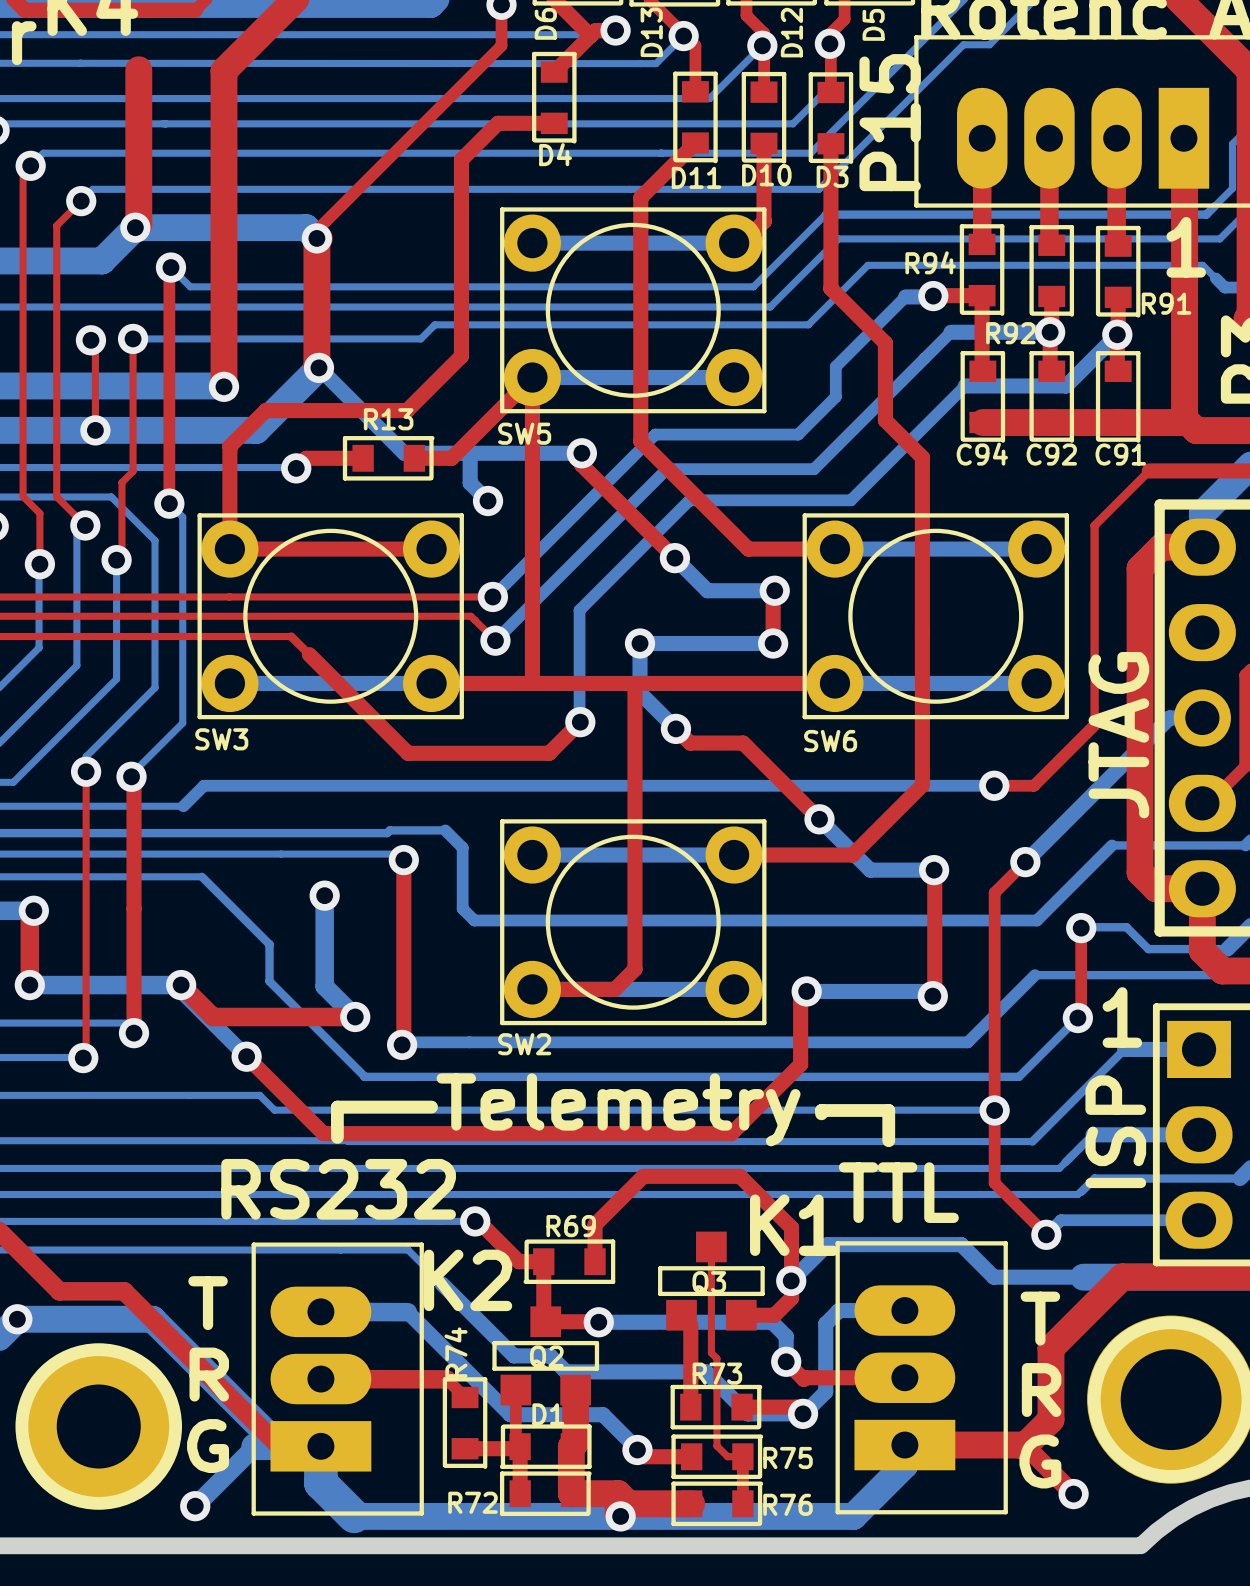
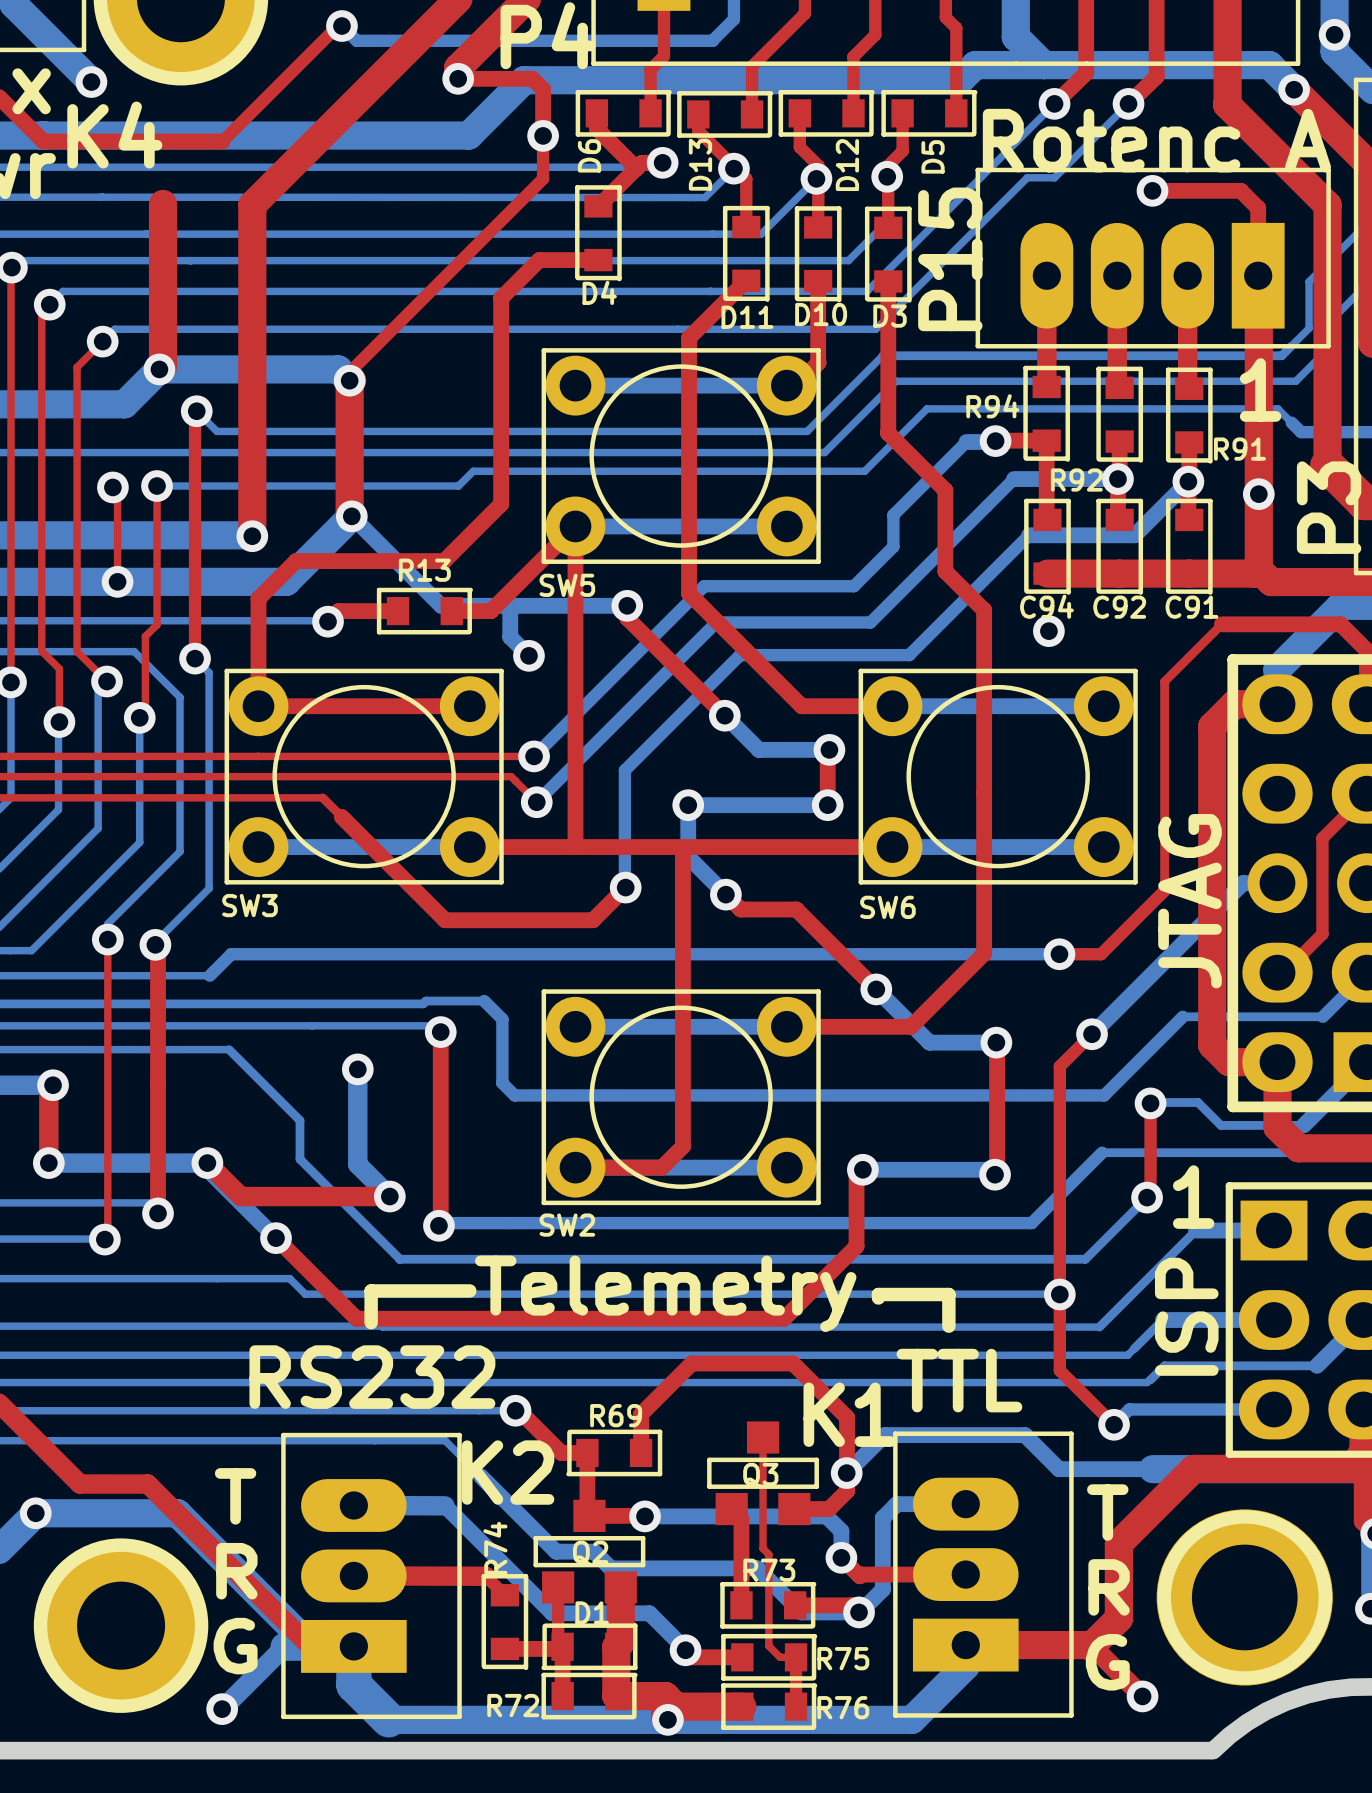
top track: none -> (1152, 190) (1240, 190) (1258, 208) (1258, 275)
via: none -> (1152, 190)
via: none -> (1258, 494)
via: none -> (1048, 631)

